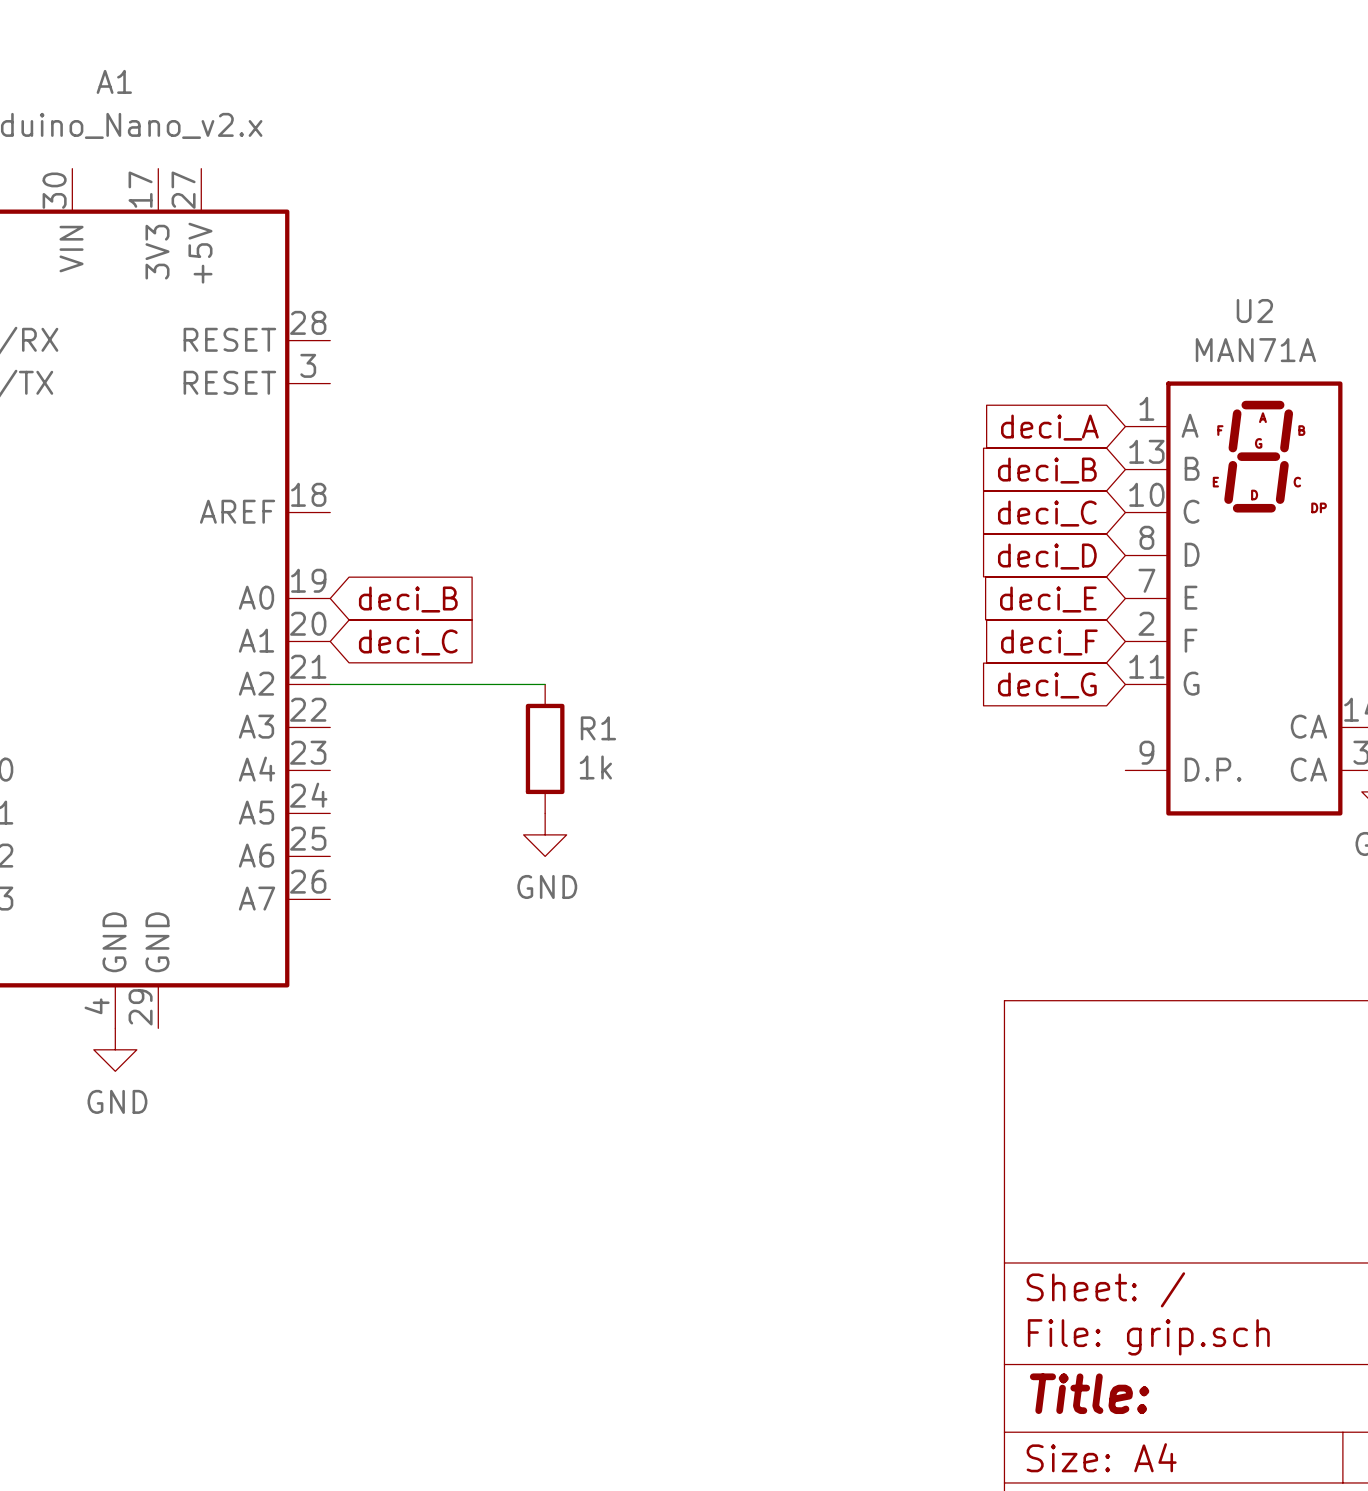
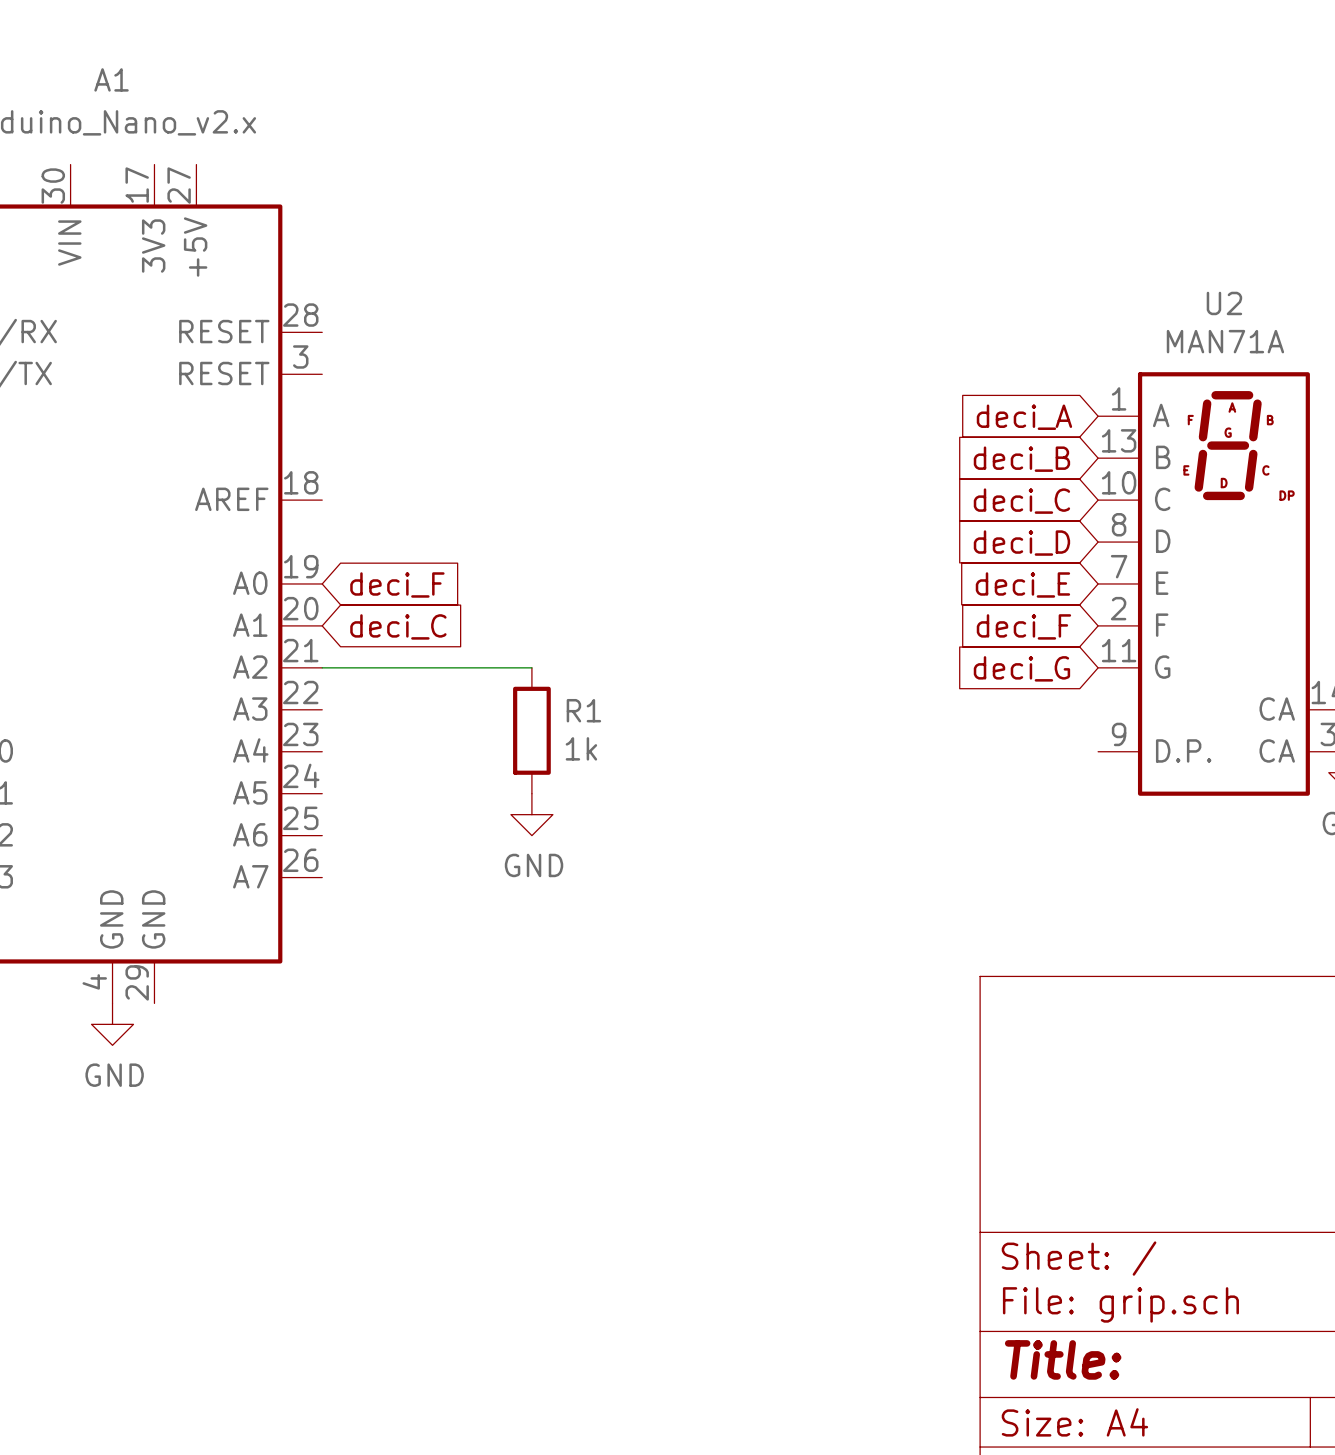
global label: deci_B (408, 599) -> deci_F (397, 584)

